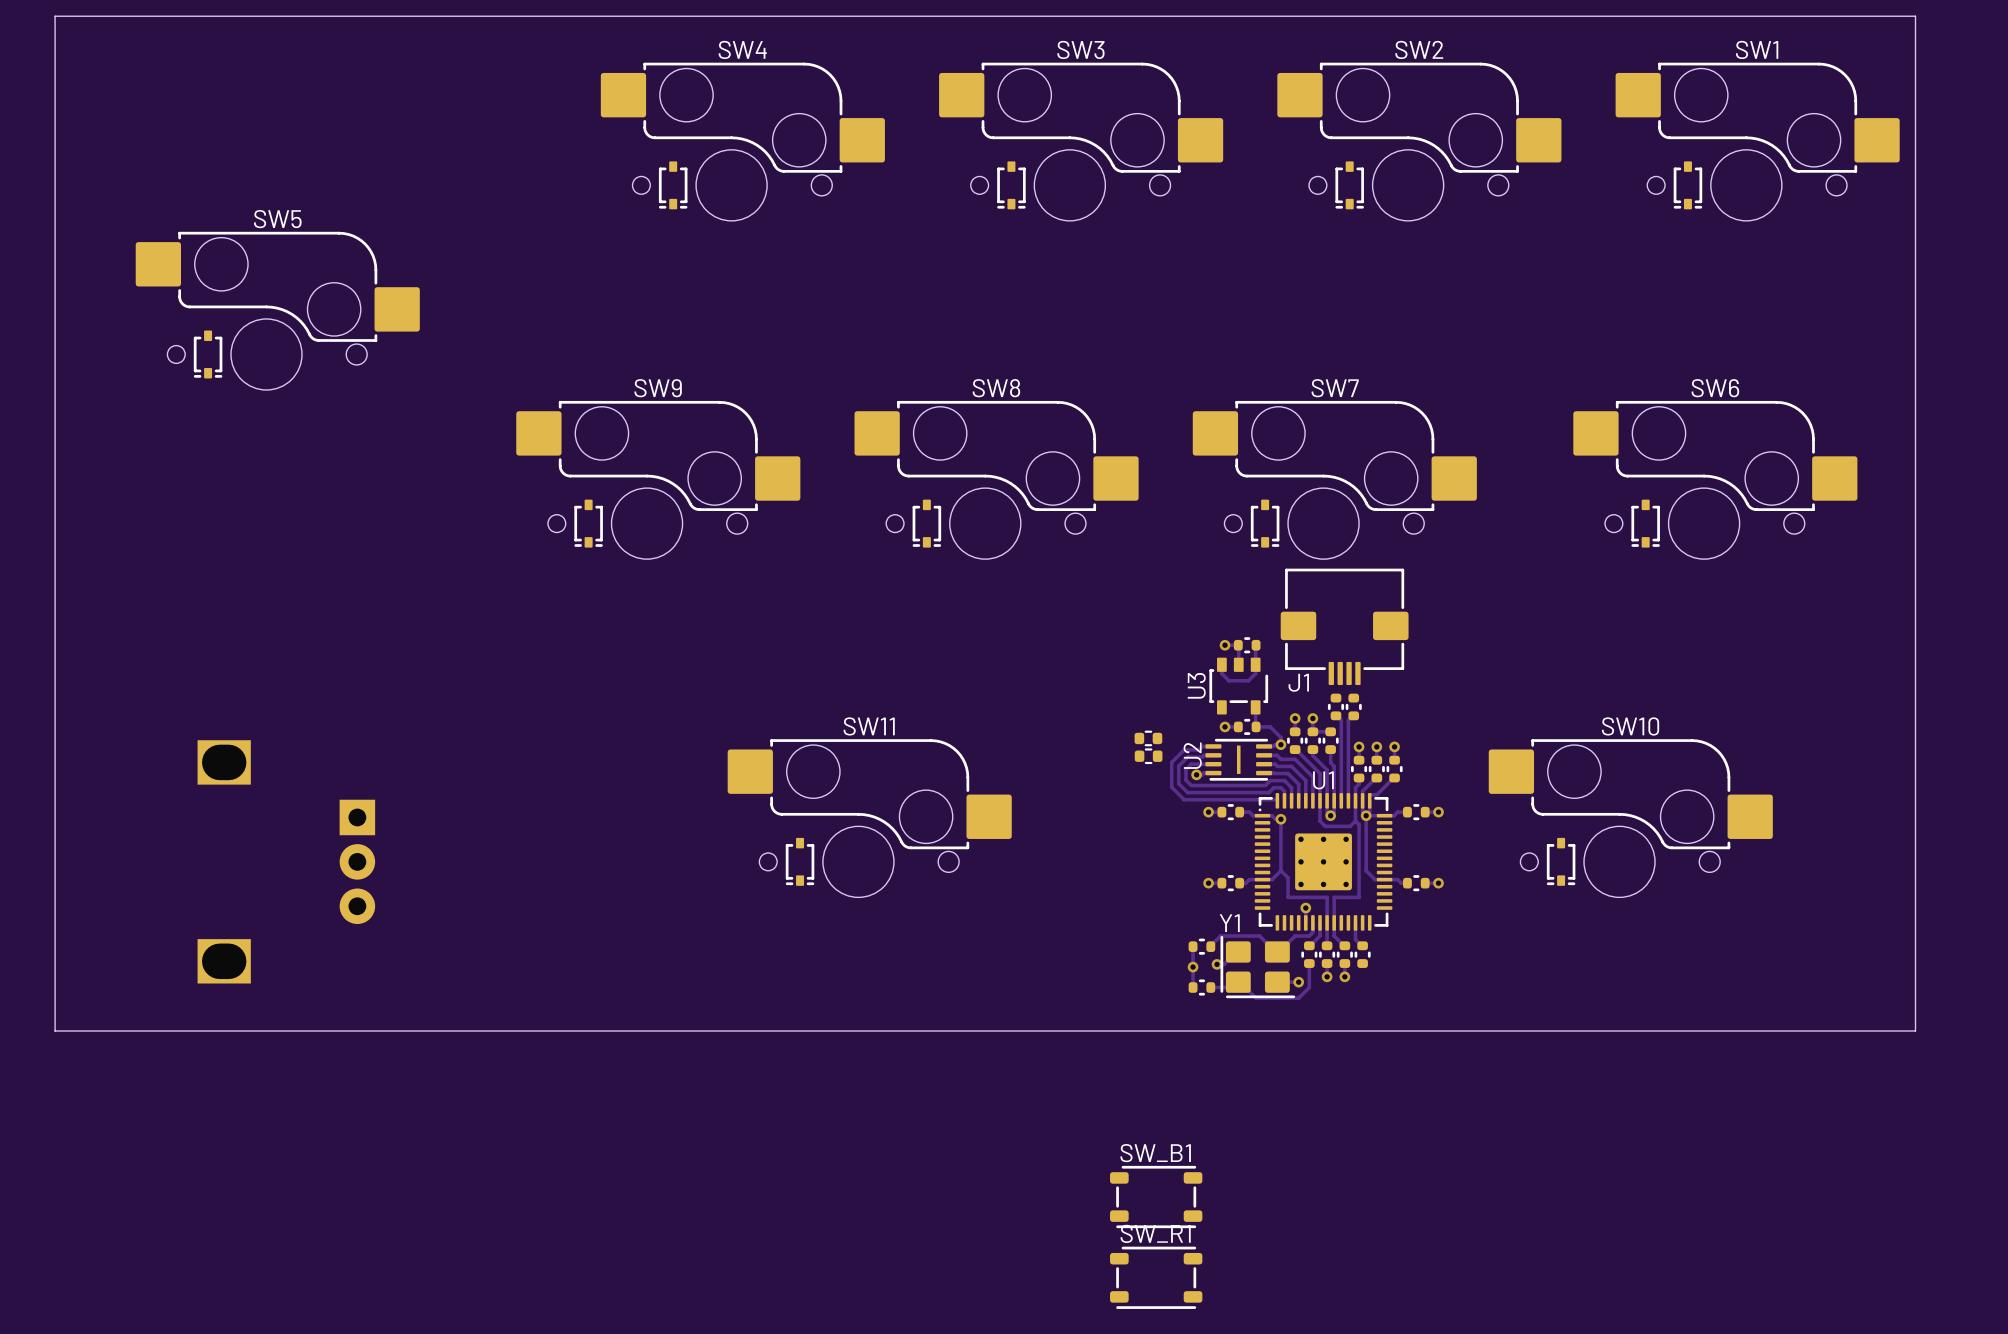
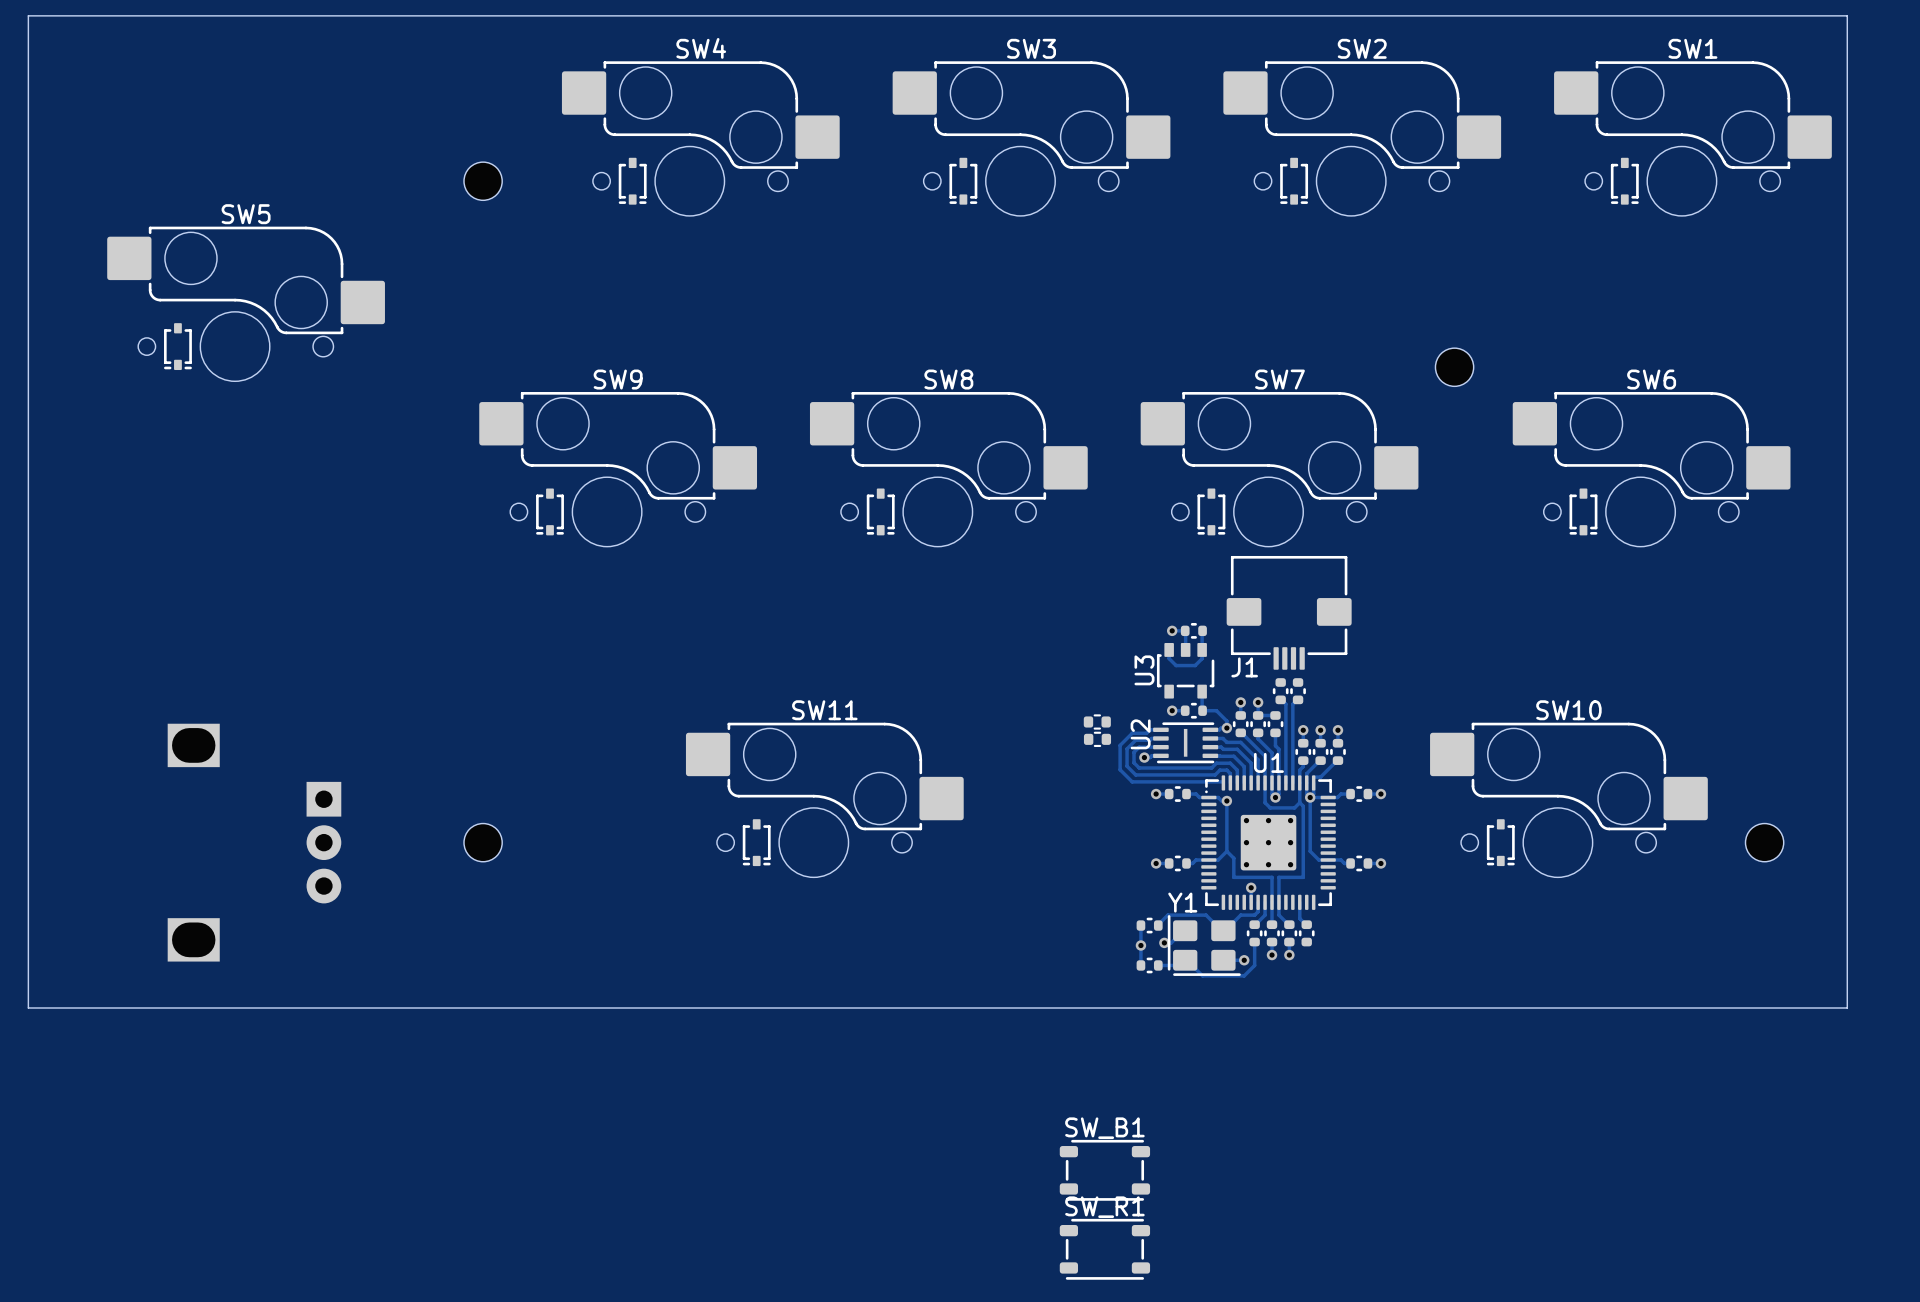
part: none -> (483, 181)
part: none -> (1454, 367)
part: none -> (483, 842)
part: none -> (1764, 842)

